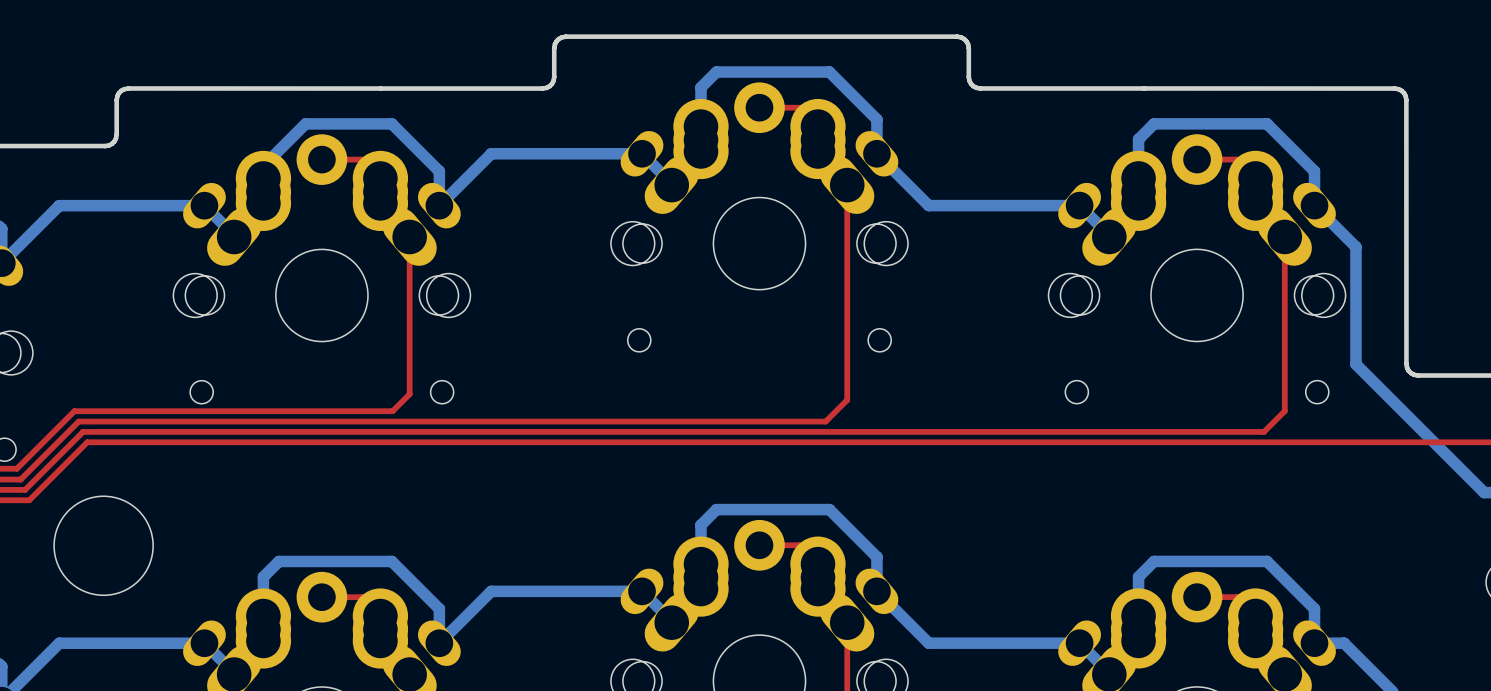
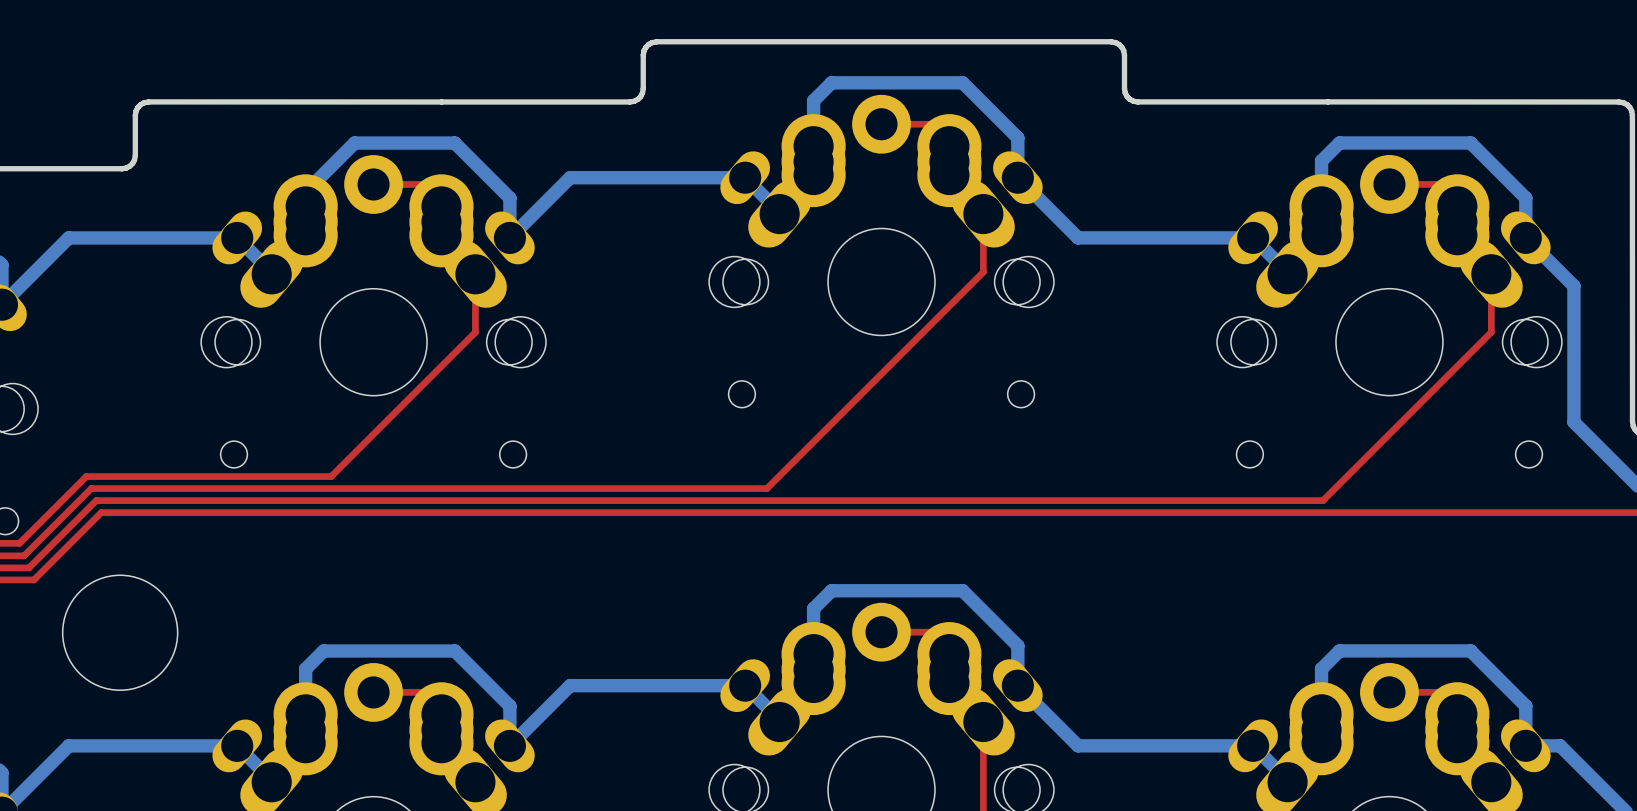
top track: (847, 235) (847, 400) (825, 421) (660, 421) -> (983, 272) (766, 488)
top track: (409, 286) (409, 394) (392, 411) (285, 411) -> (475, 332) (331, 476)
top track: (1284, 286) (1284, 411) (1264, 431) (1139, 431) -> (1491, 332) (1322, 500)

